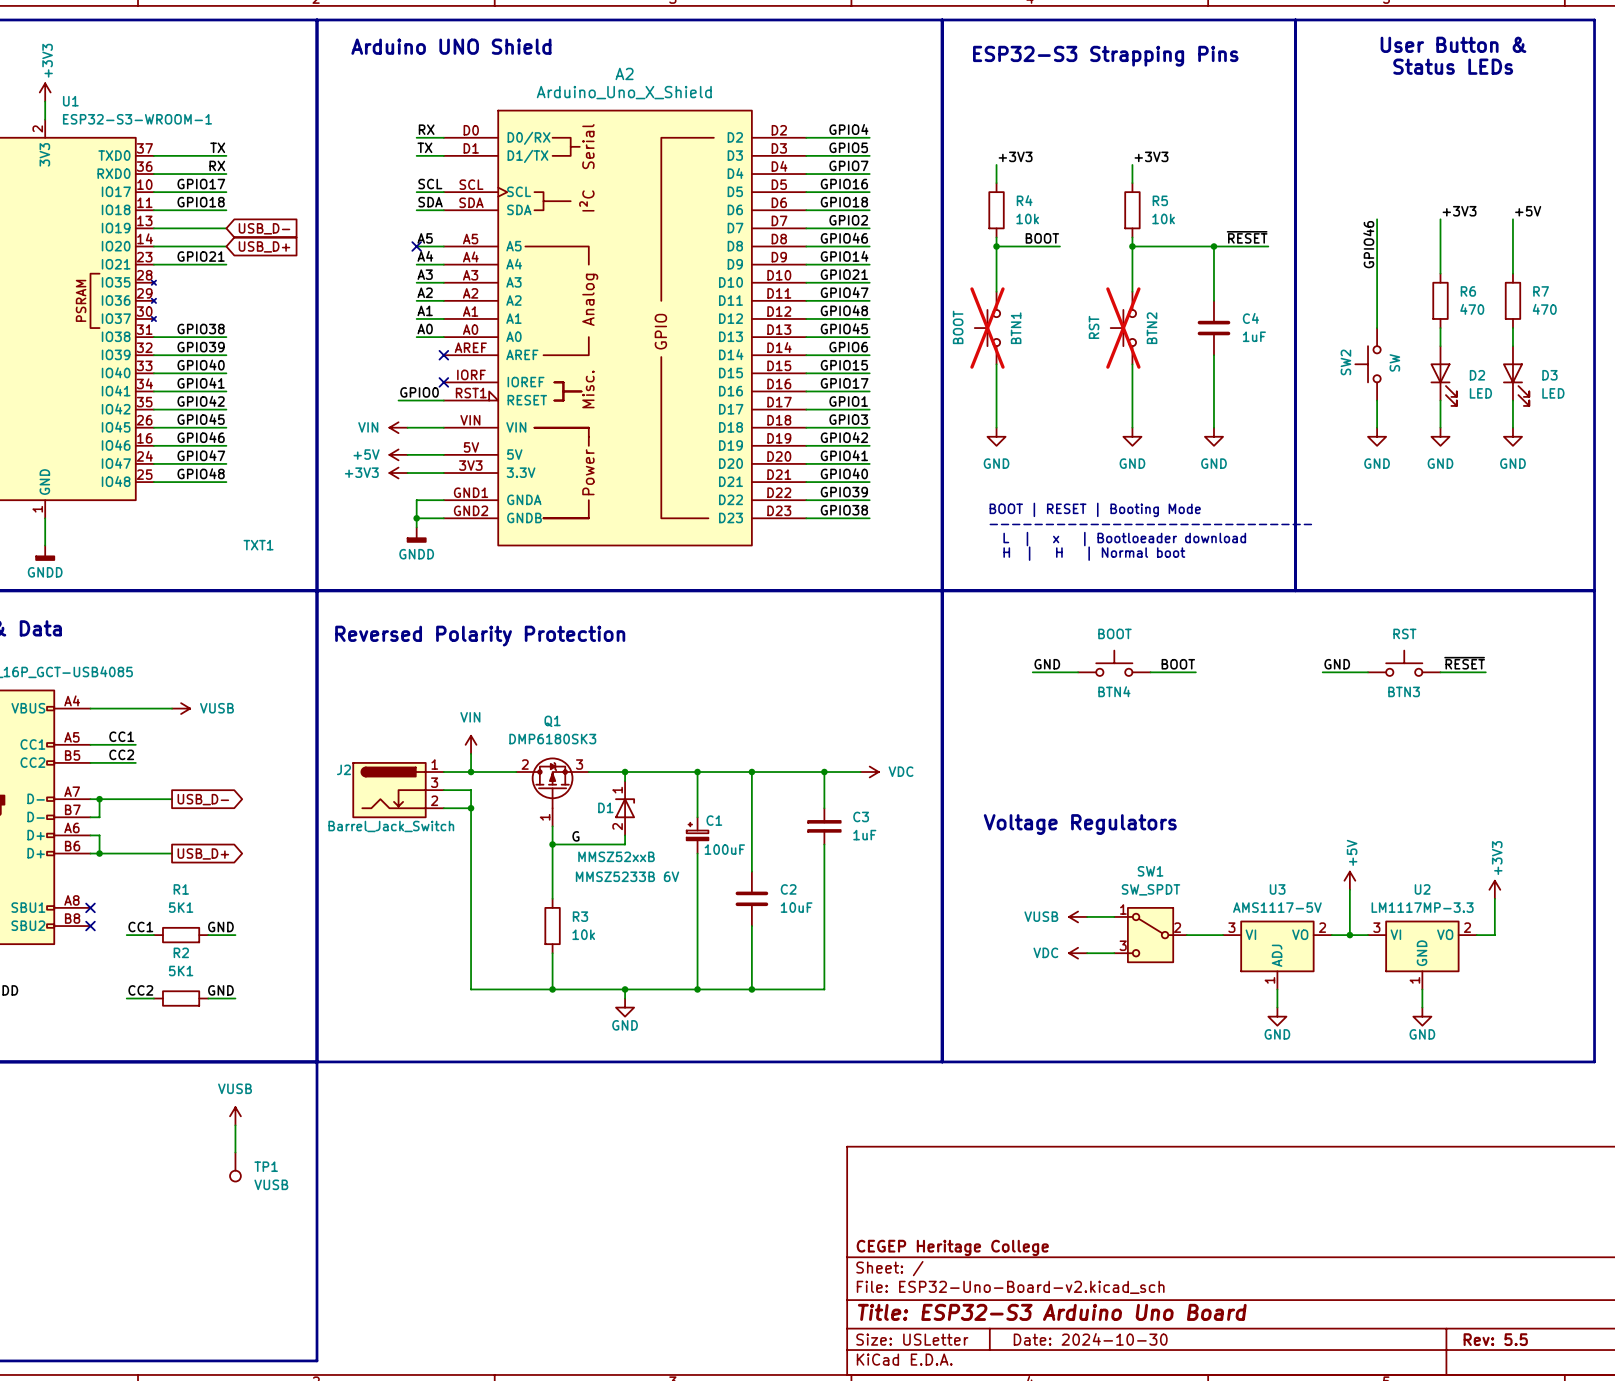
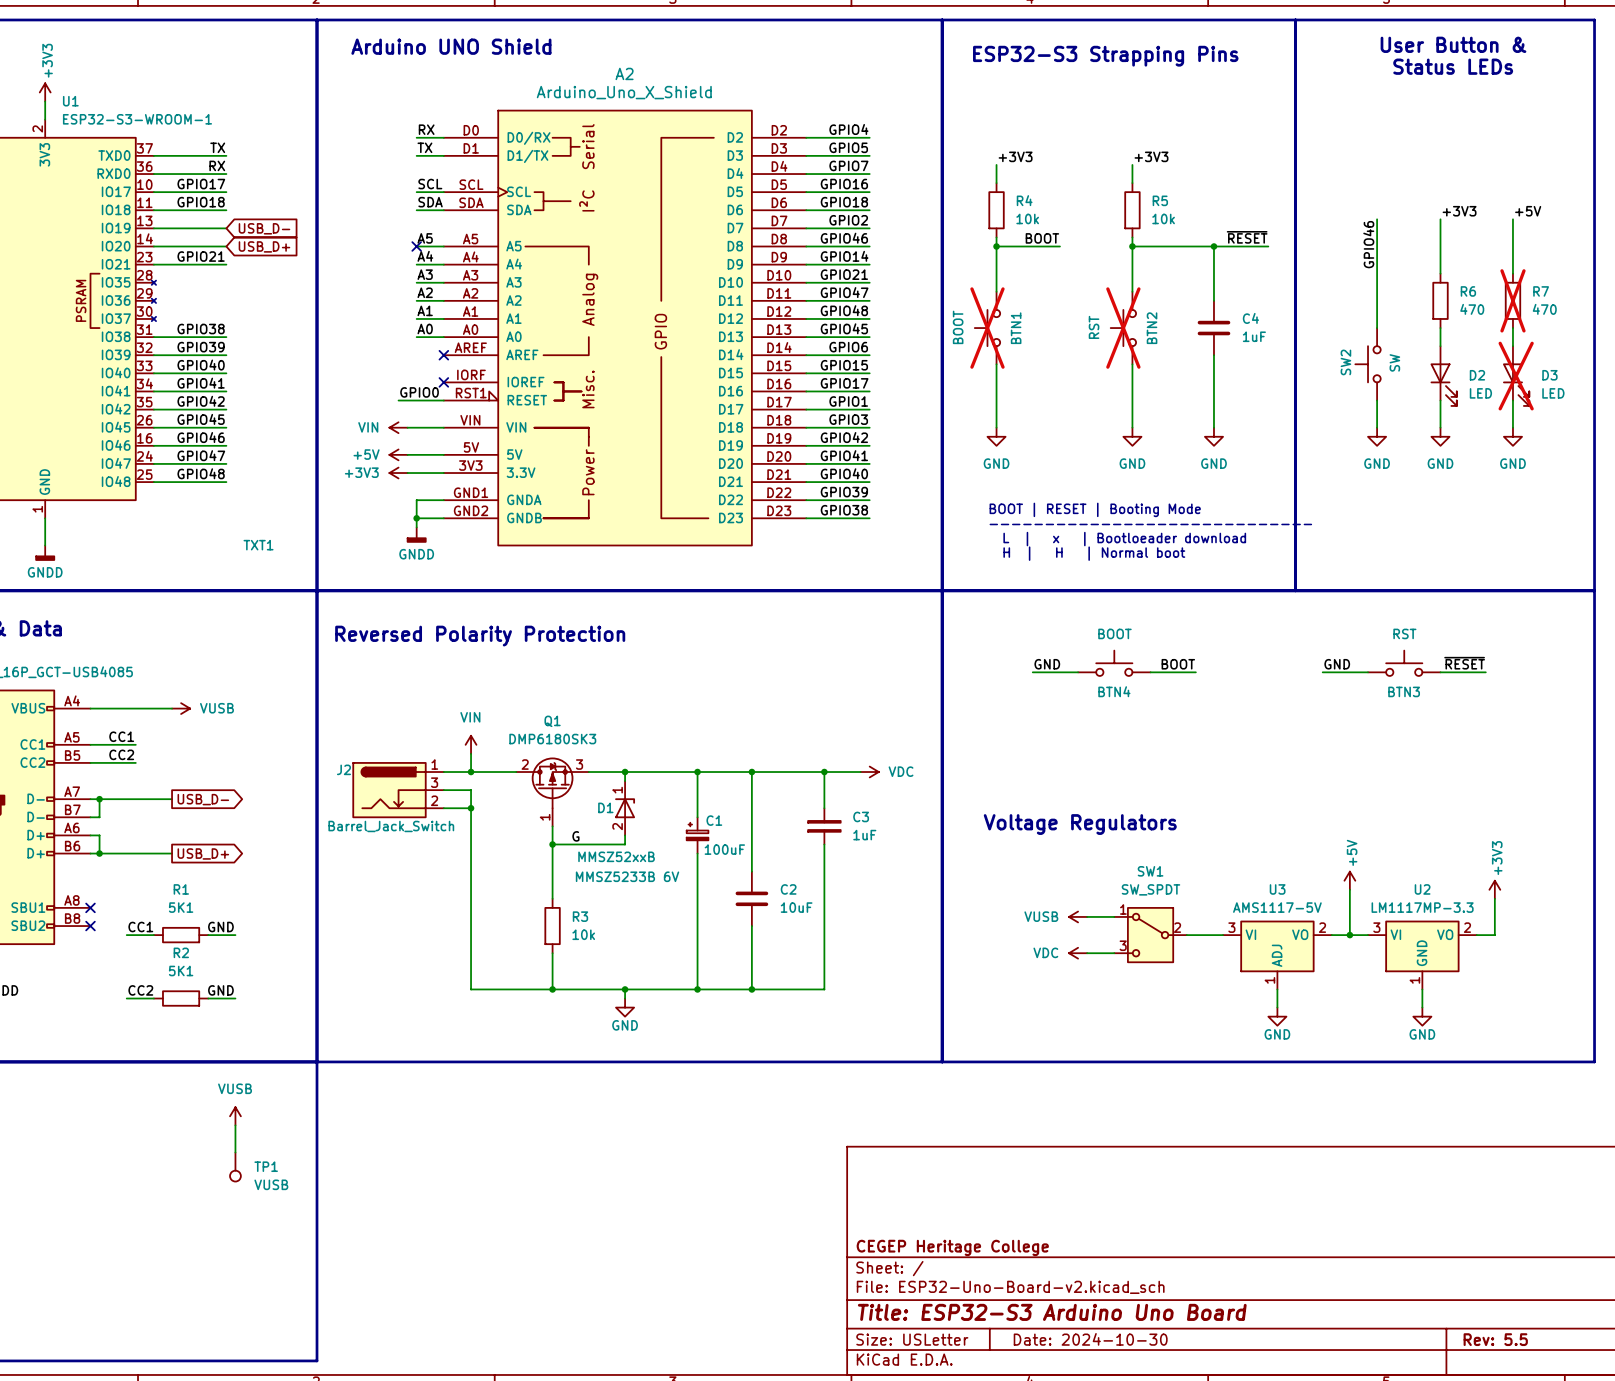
R7 do-not-place cross: none -> (1512, 300)
D3 do-not-place cross: none -> (1516, 376)

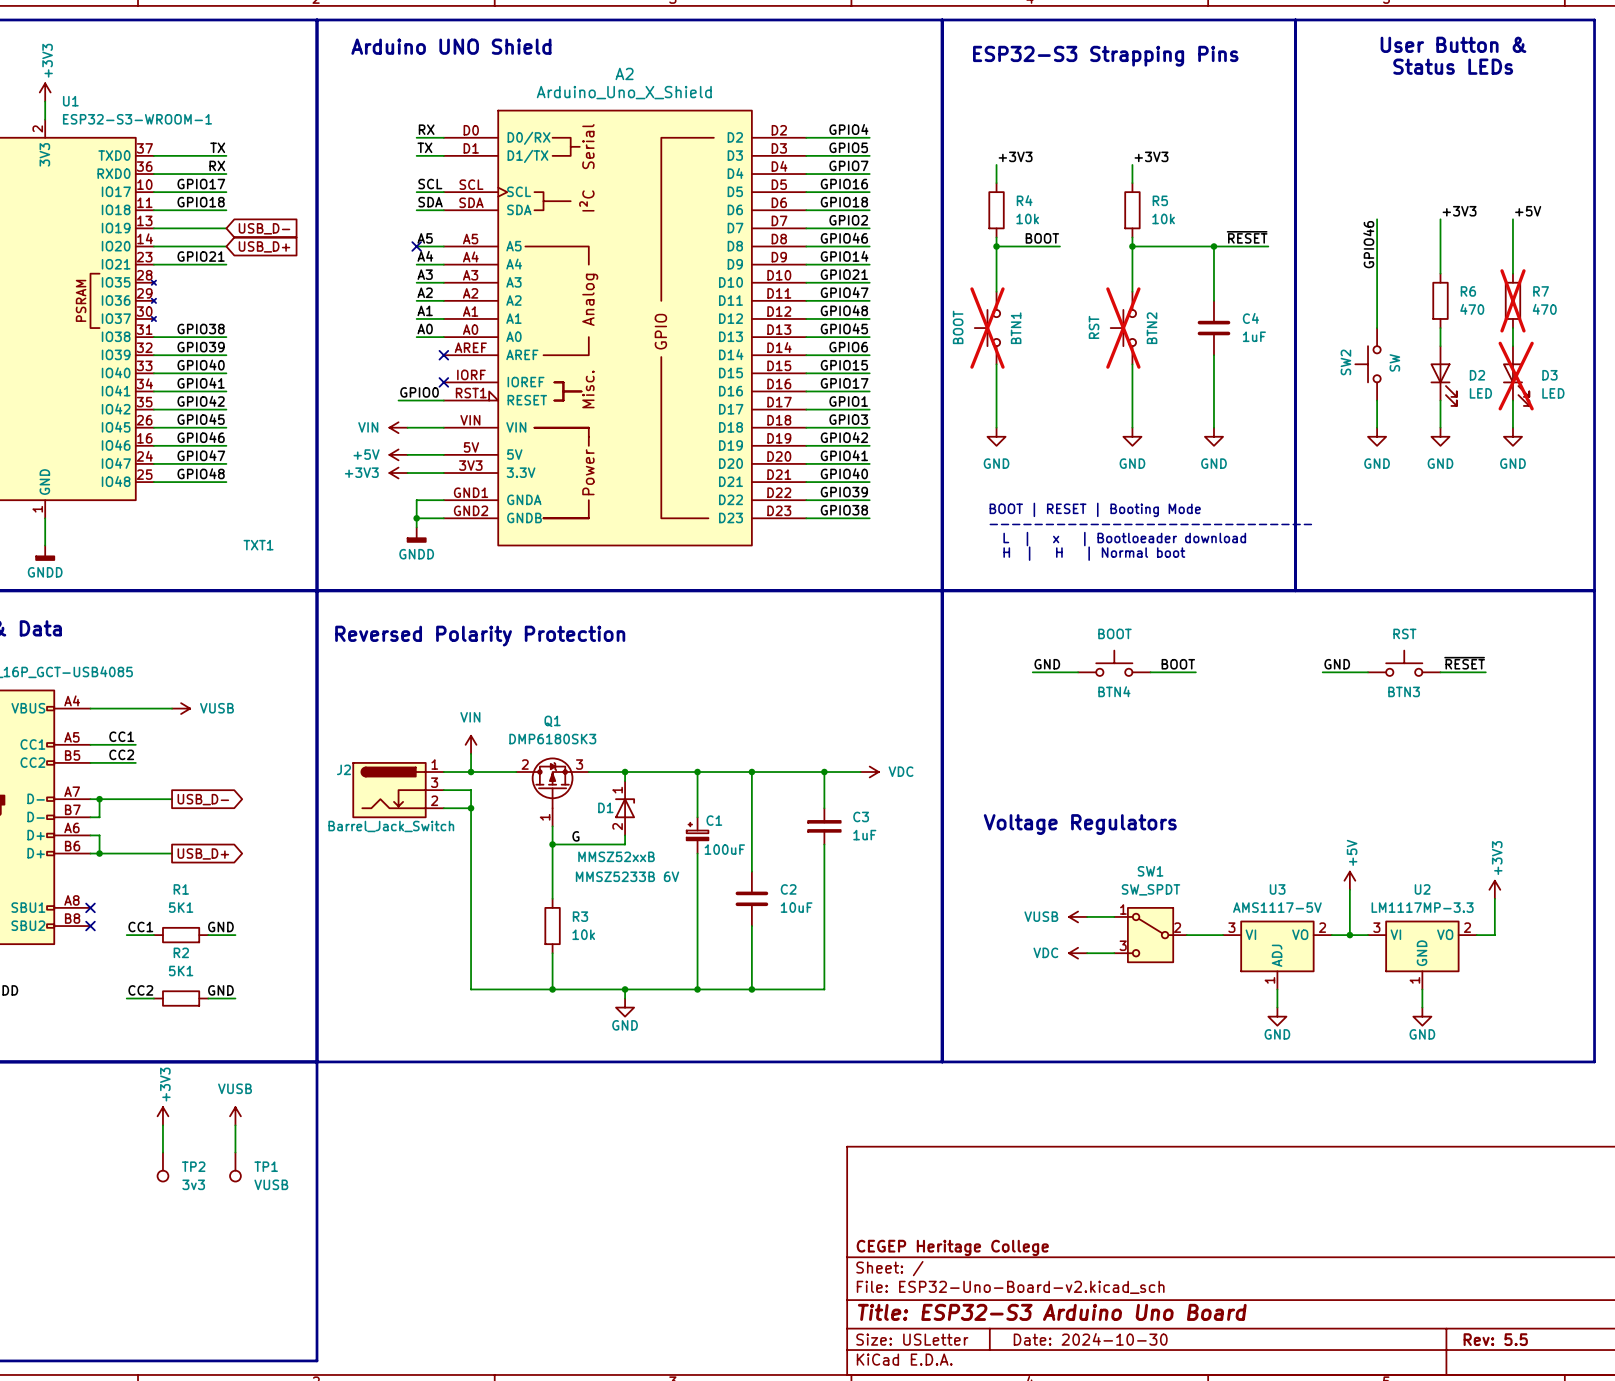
power symbol: none -> +3V3 (162, 1116)
wire: none -> (162, 1125) (162, 1152)
TP2: none -> 3v3 (162, 1167)

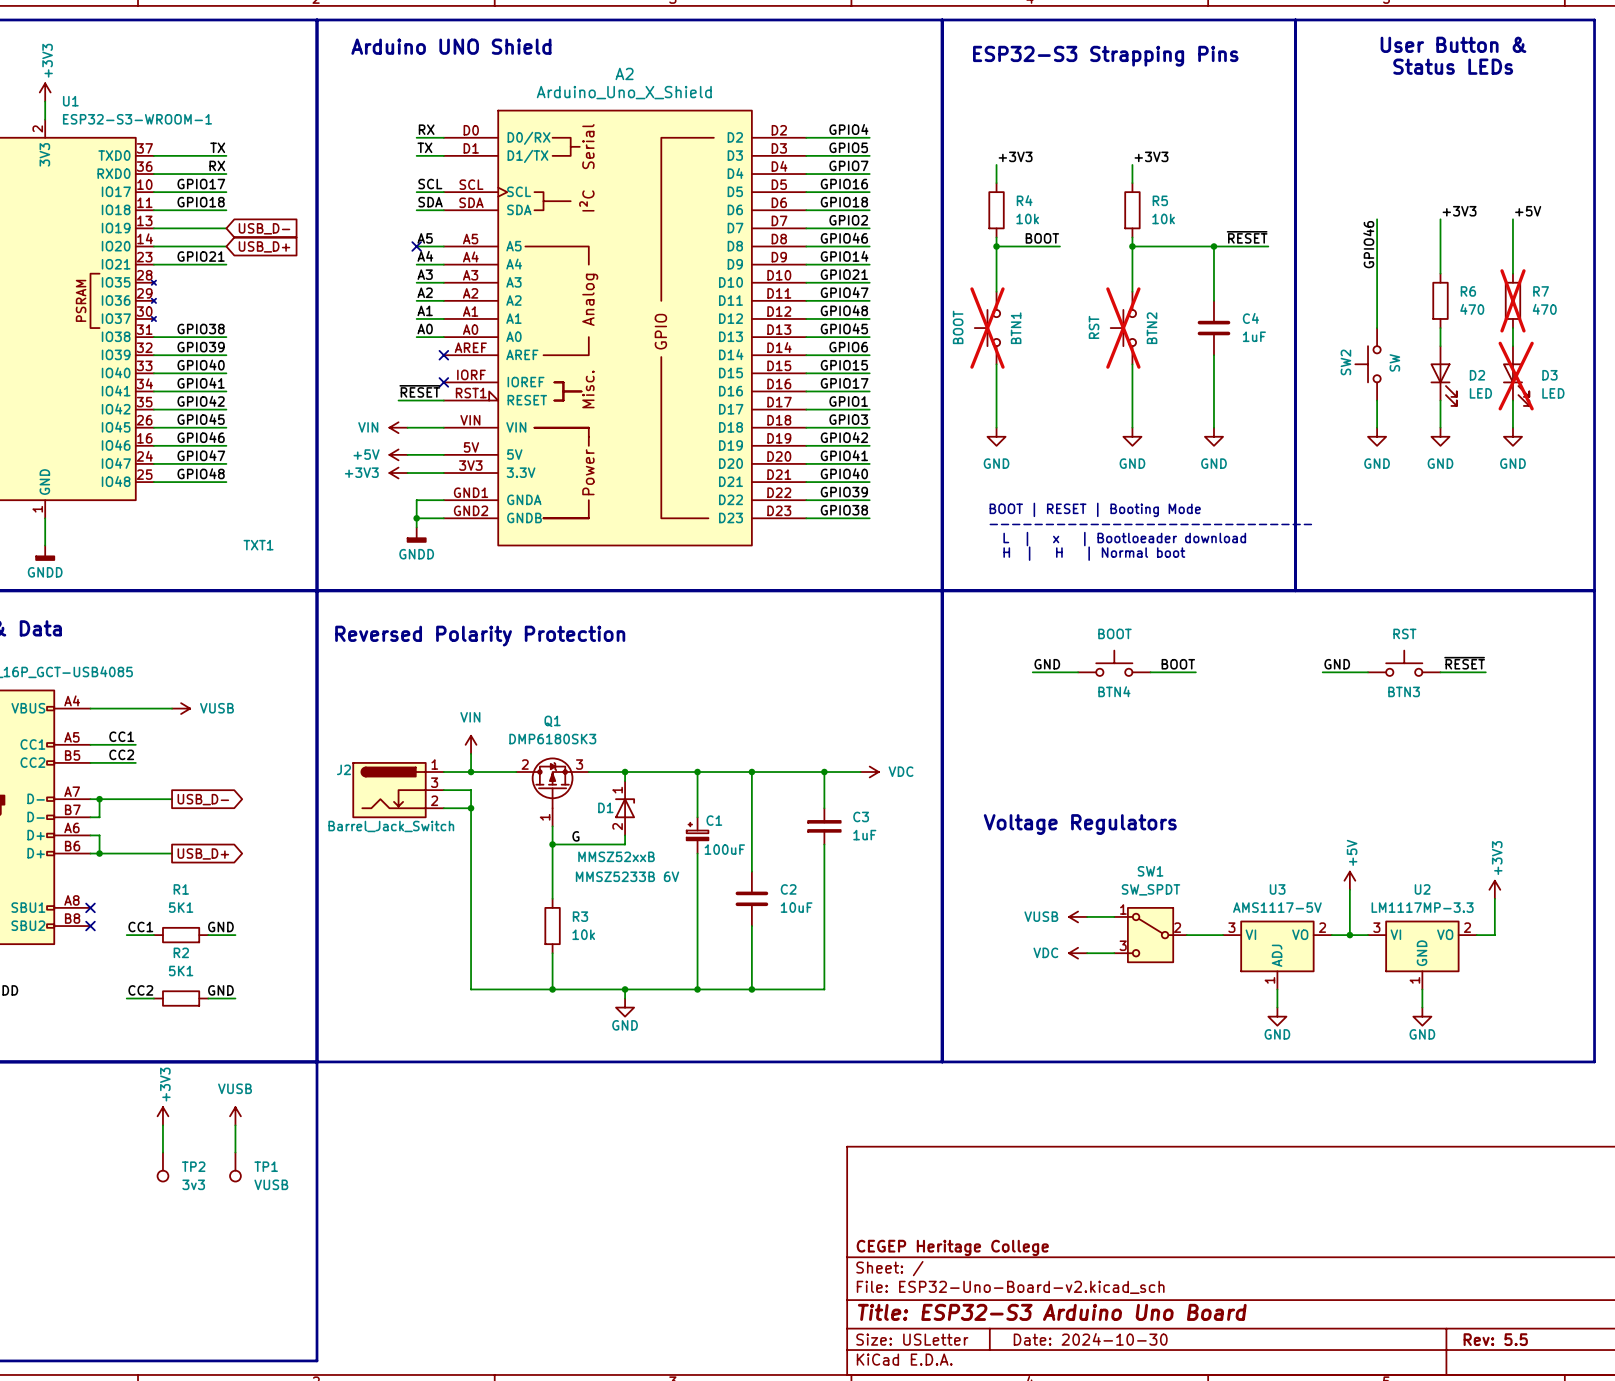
label: GPIO0 (419, 392) -> ~{RESET} (419, 391)

